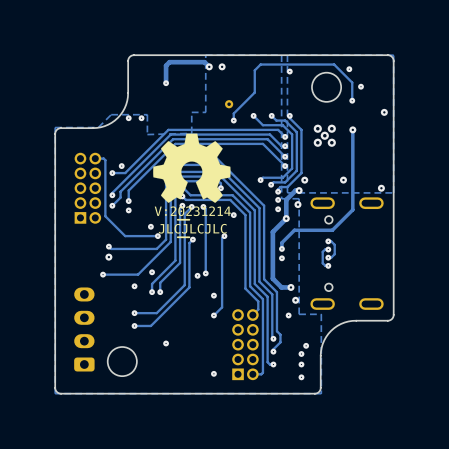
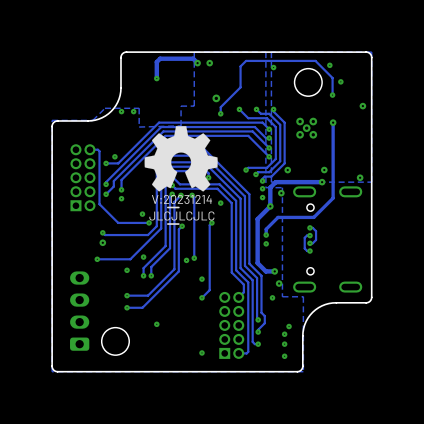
track: (299, 190) (295, 190) (286, 199) -> (322, 182) (275, 182) (270, 188)
via position: (299, 190) -> (322, 182)

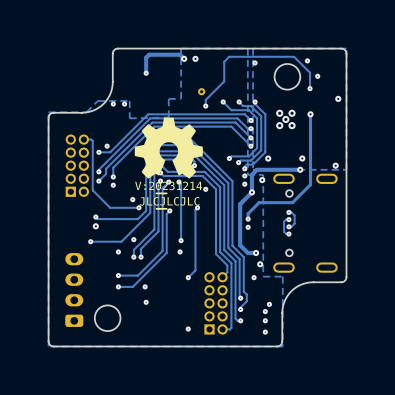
drawing shape: [151, 194, 213, 209] -> [135, 181, 203, 195]
via: (186, 260) -> none
via: none -> (180, 251)
via: (201, 279) -> none
via: none -> (145, 286)

